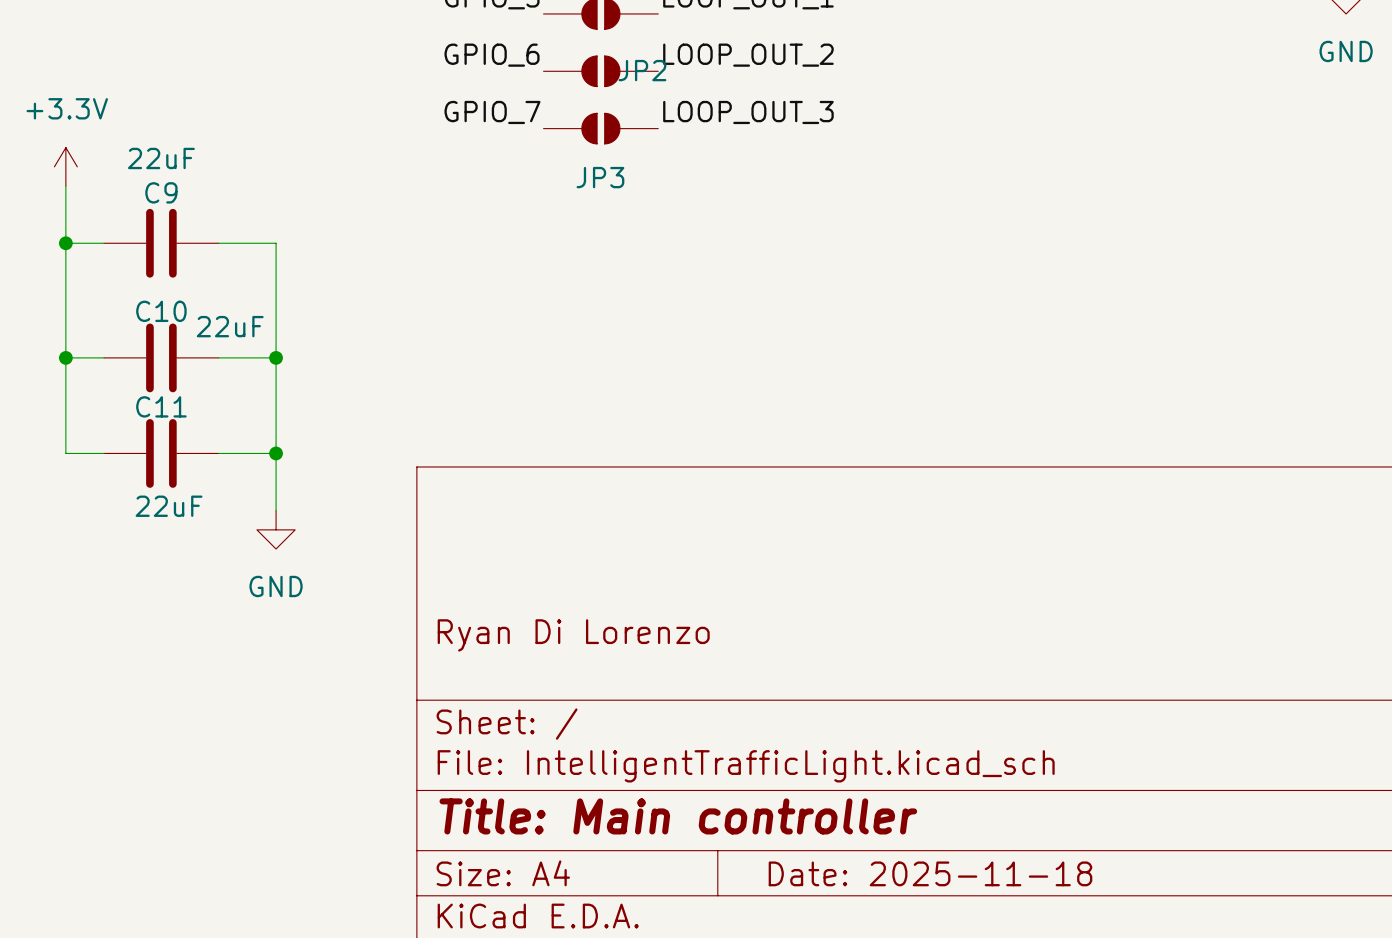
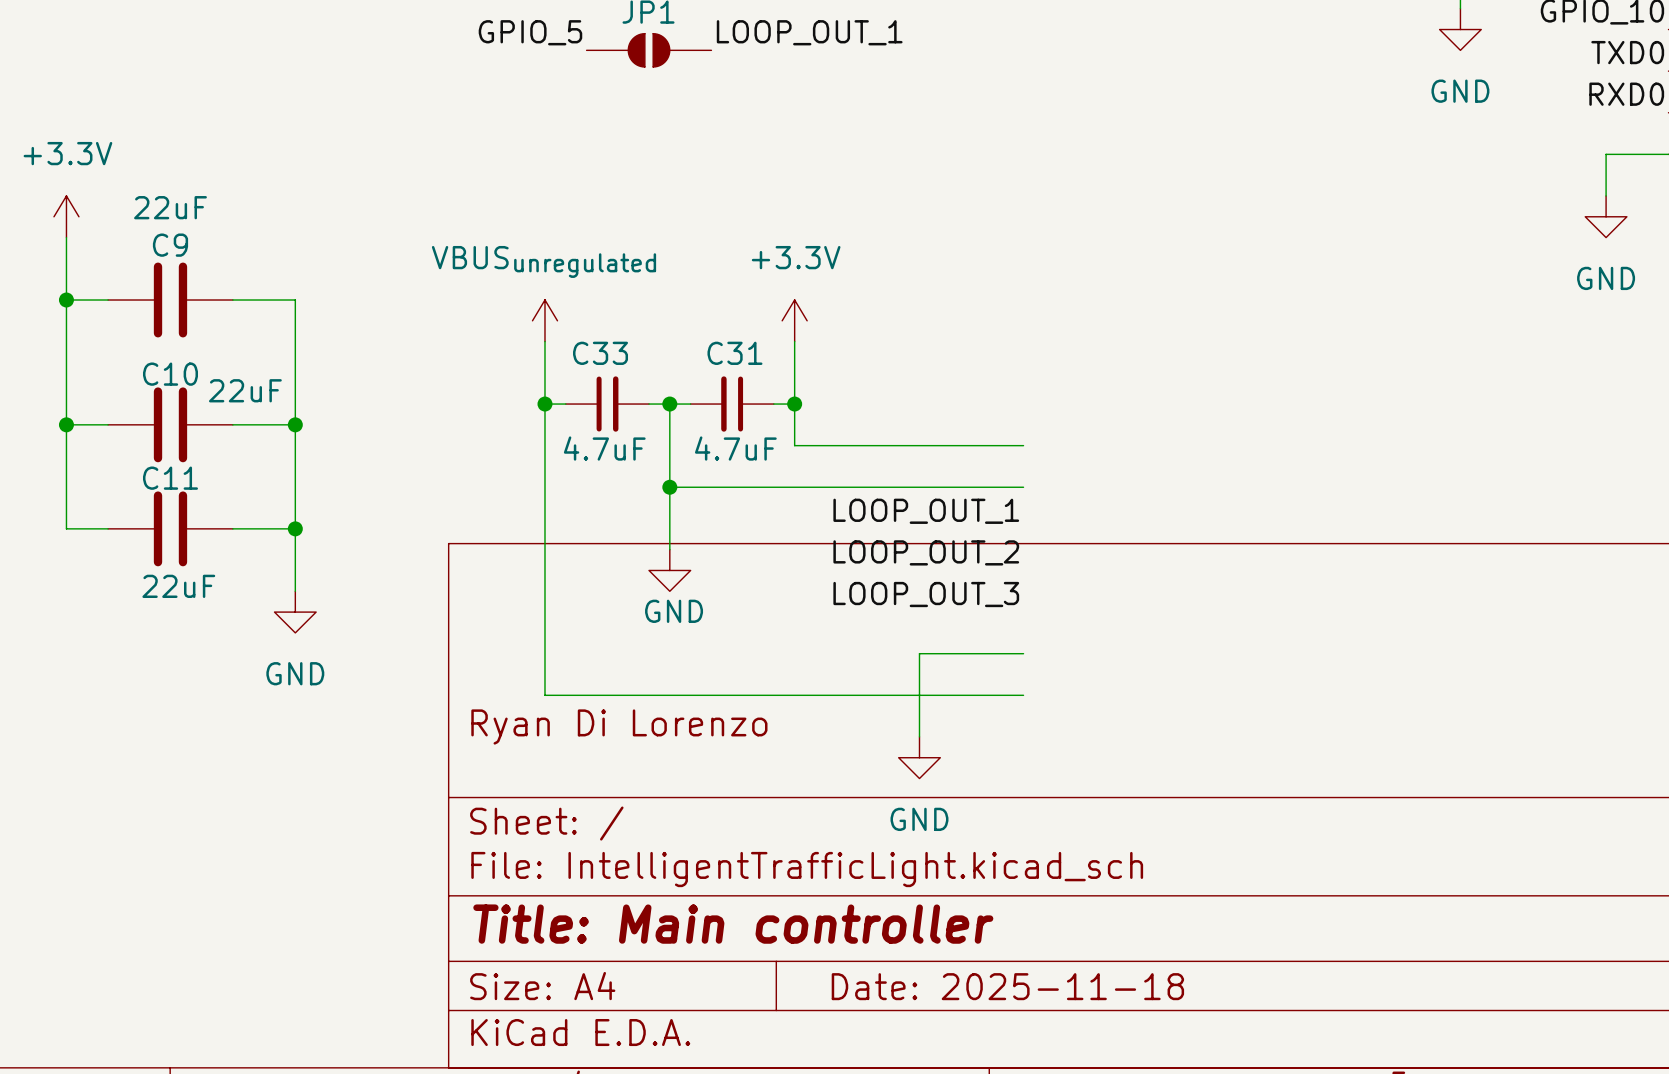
label: GPIO_6 (492, 55) -> none
label: LOOP_OUT_2 (748, 55) -> none
JP2: (600, 71) -> none
label: GPIO_7 (492, 112) -> none
label: LOOP_OUT_3 (748, 112) -> none
JP3: (600, 128) -> none
power symbol: none -> VBUSunregulated (544, 320)
power symbol: none -> +3.3V (794, 320)
wire: none -> (544, 341) (544, 695) (1023, 695)
wire: none -> (794, 341) (794, 445) (1023, 445)
wire: none -> (544, 404) (565, 404)
junction: none -> (544, 404)
C33: none -> 4.7uF (607, 404)
wire: none -> (649, 404) (690, 404)
wire: none -> (669, 404) (669, 549)
junction: none -> (669, 404)
C31: none -> 4.7uF (732, 404)
wire: none -> (773, 404) (794, 404)
junction: none -> (794, 404)
wire: none -> (669, 487) (1023, 487)
junction: none -> (669, 487)
label: none -> LOOP_OUT_1 (926, 511)
label: none -> LOOP_OUT_2 (926, 552)
power symbol: none -> GND (669, 570)
label: none -> LOOP_OUT_3 (926, 594)
wire: none -> (1023, 653) (919, 653) (919, 736)
power symbol: none -> GND (919, 757)

